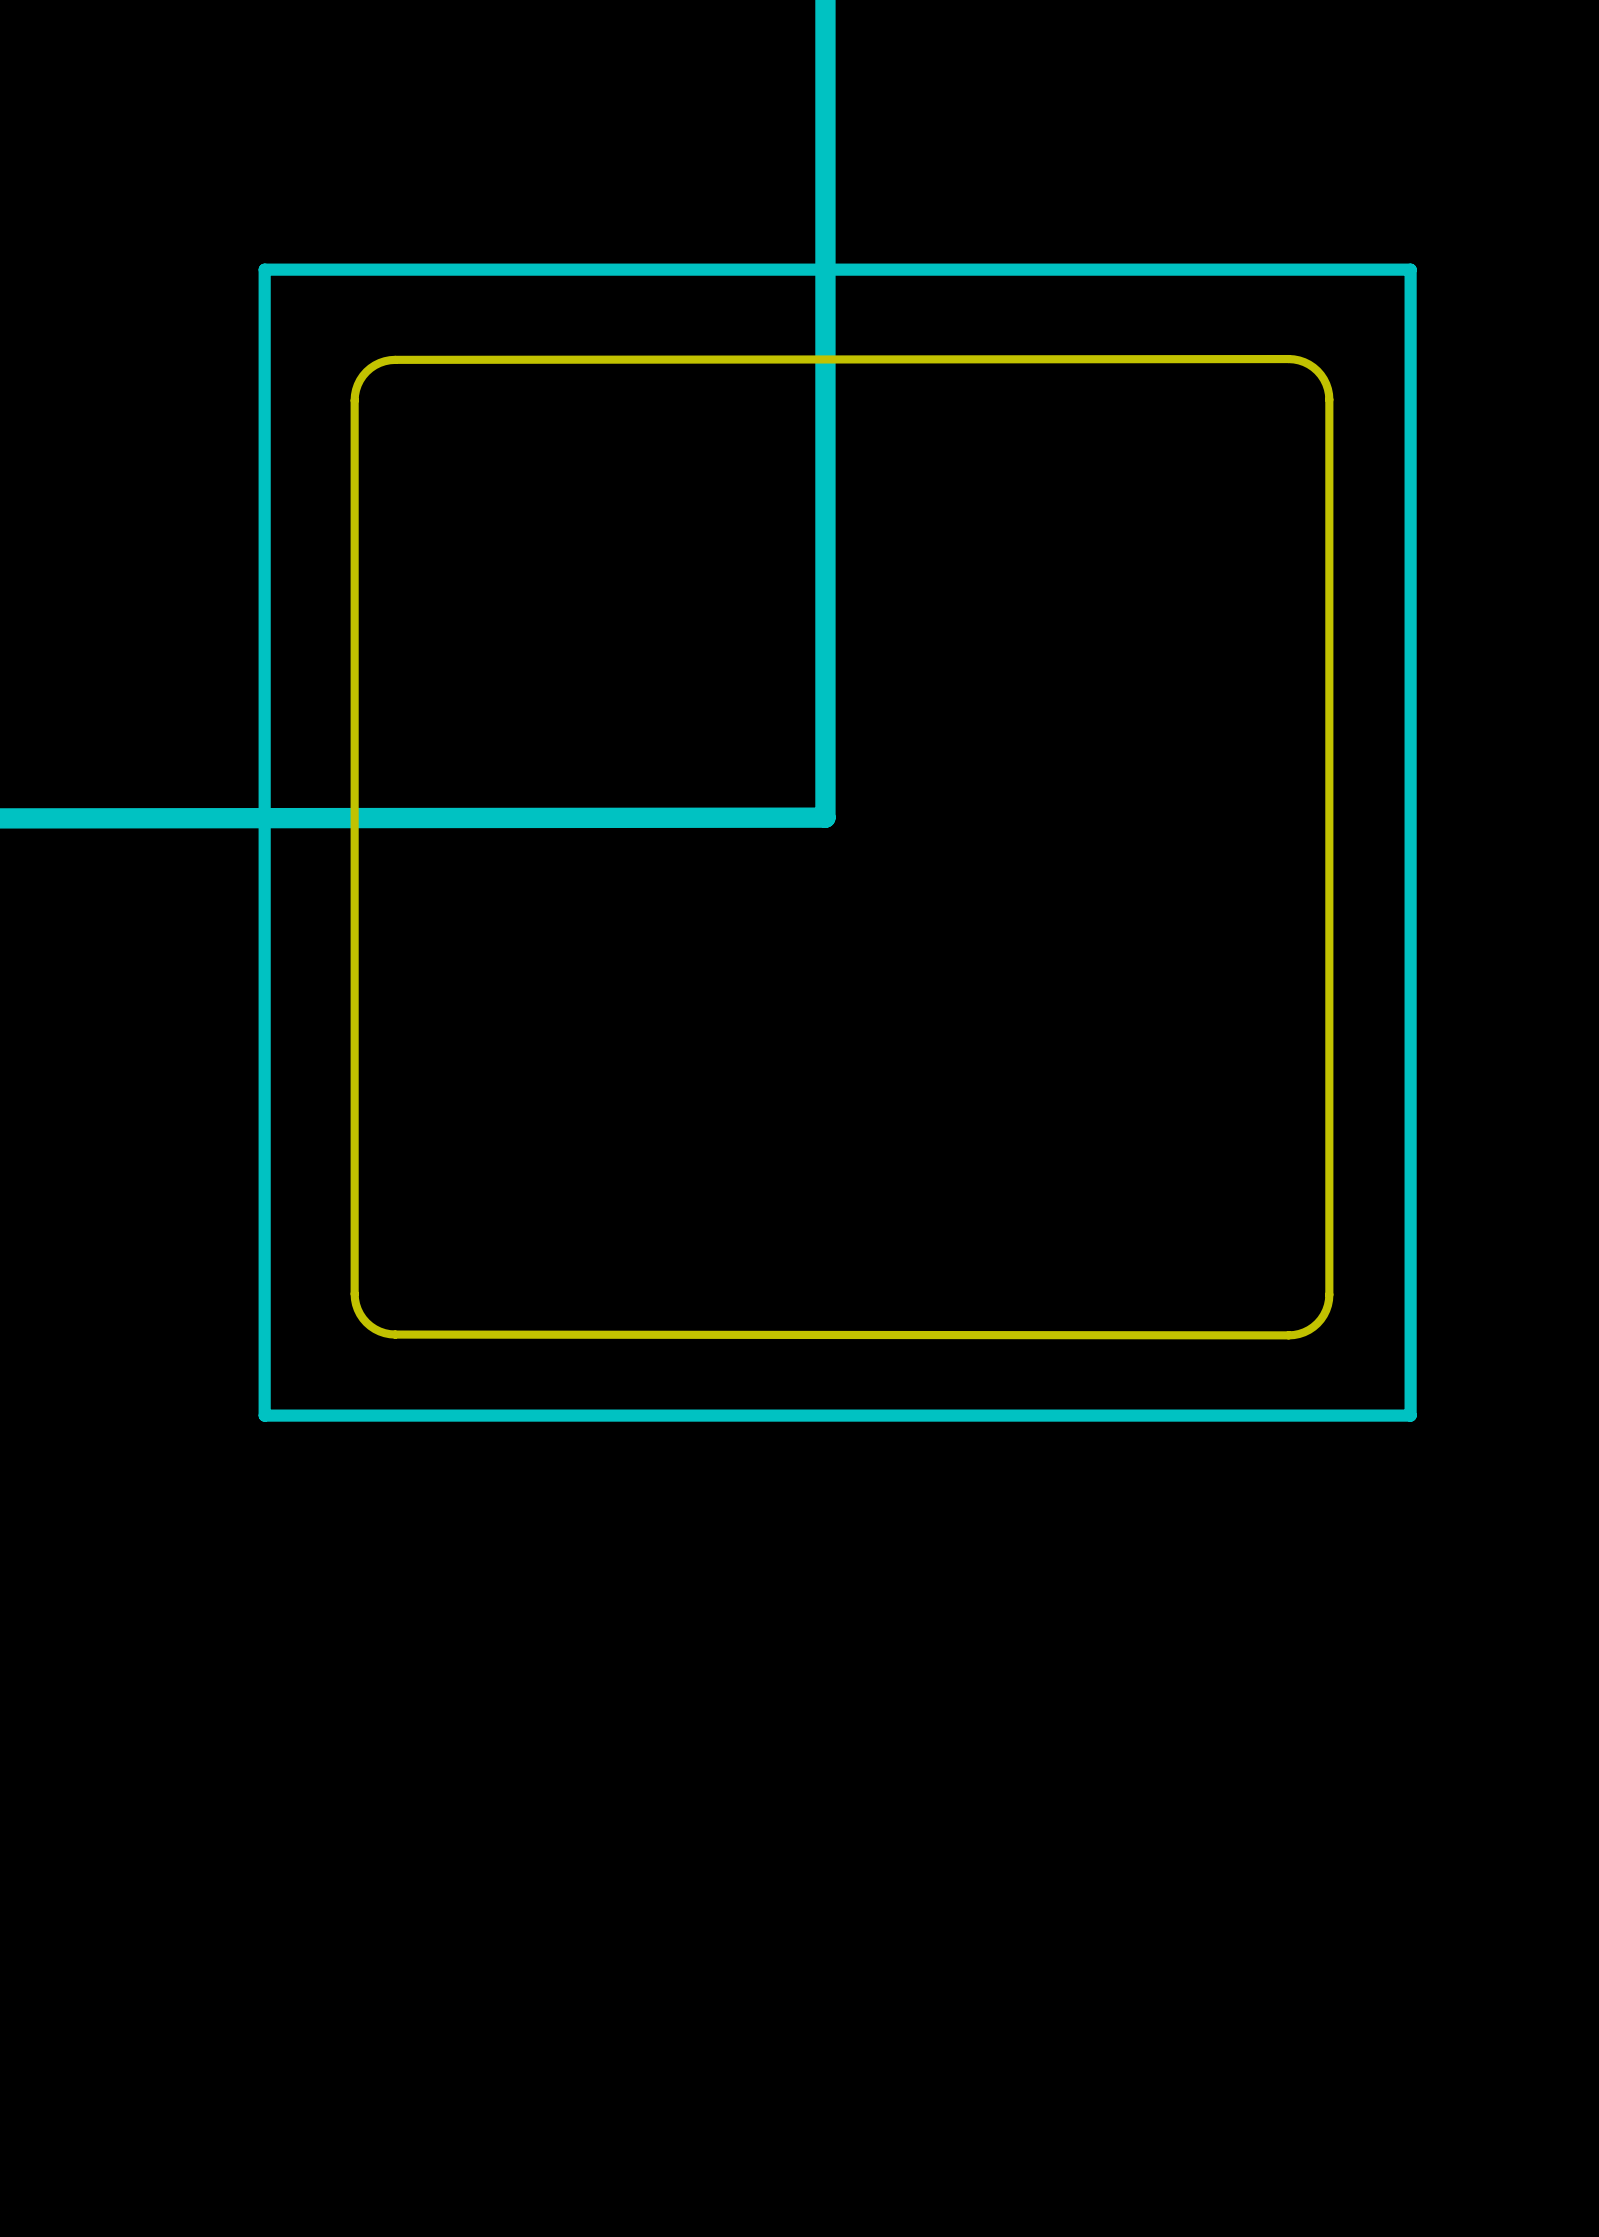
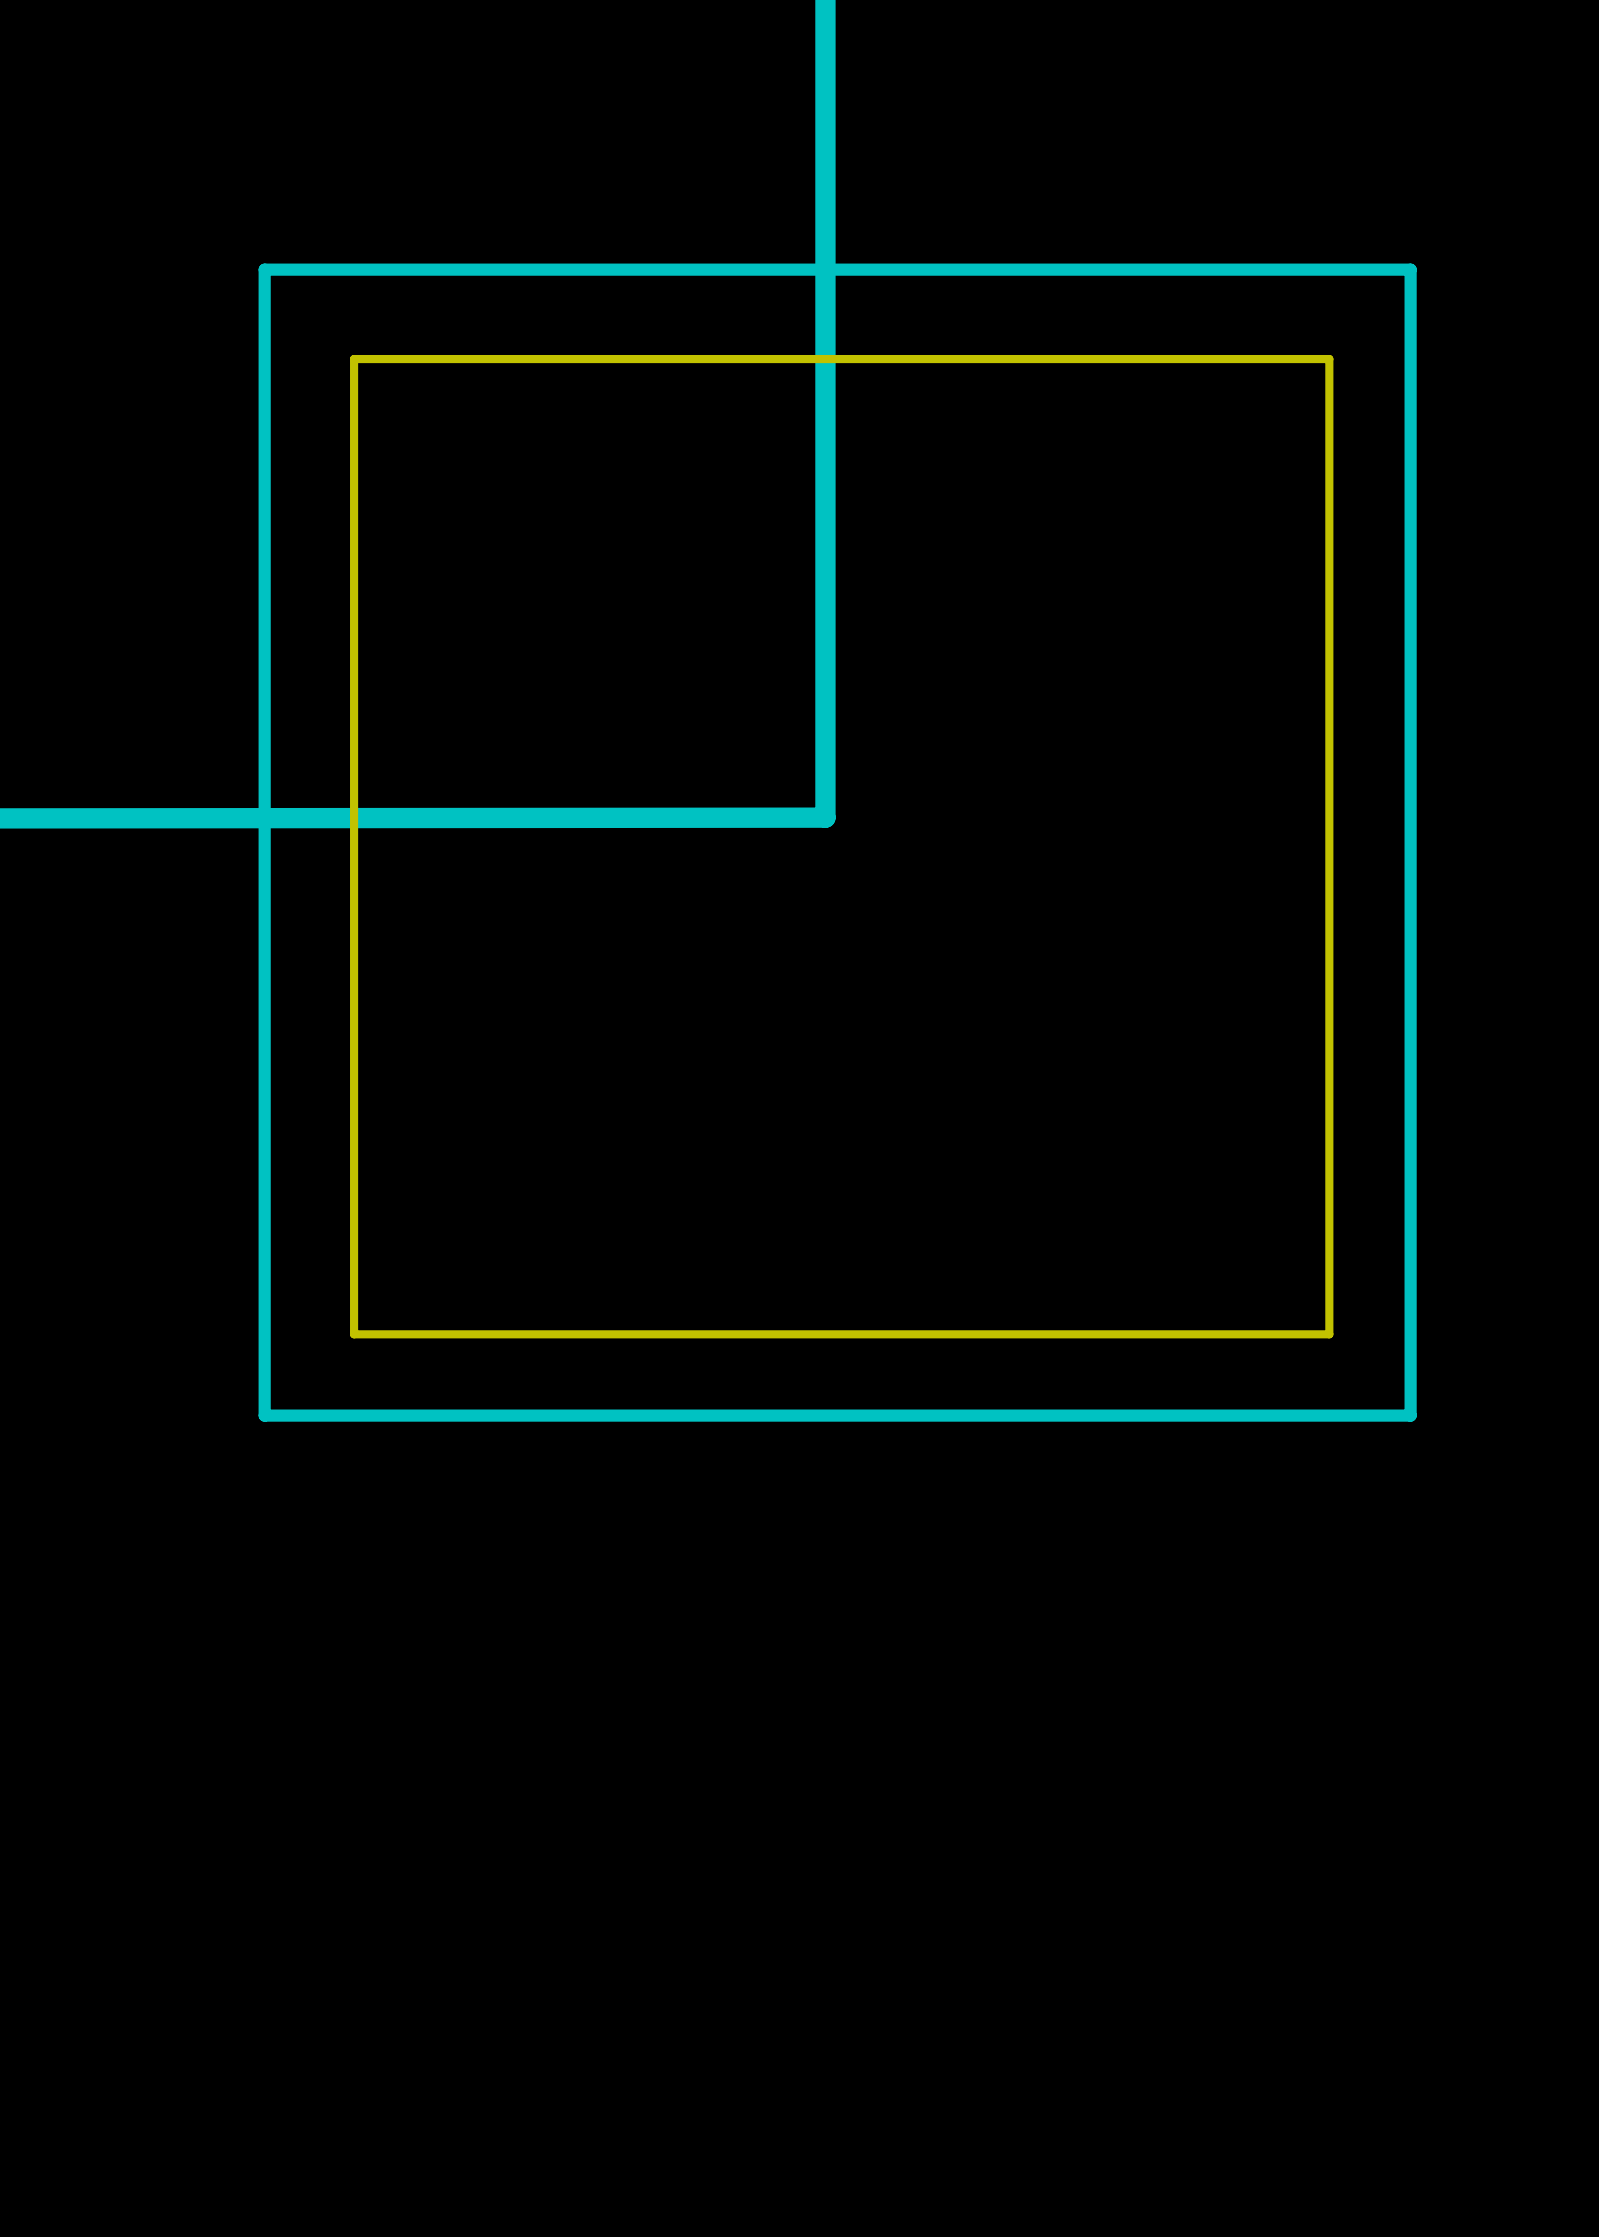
board edge: (1329, 399) (1326, 384) (1317, 370) (1304, 362) (1288, 359) (395, 359) (379, 362) (366, 371) (357, 384) (354, 400) (354, 1293) (357, 1309) (366, 1322) (379, 1331) (395, 1334) (1288, 1335) (1304, 1332) (1317, 1323) (1326, 1310) (1329, 1294) -> (1329, 399) (1329, 359) (354, 359) (354, 1334) (1329, 1334) (1329, 1294)

